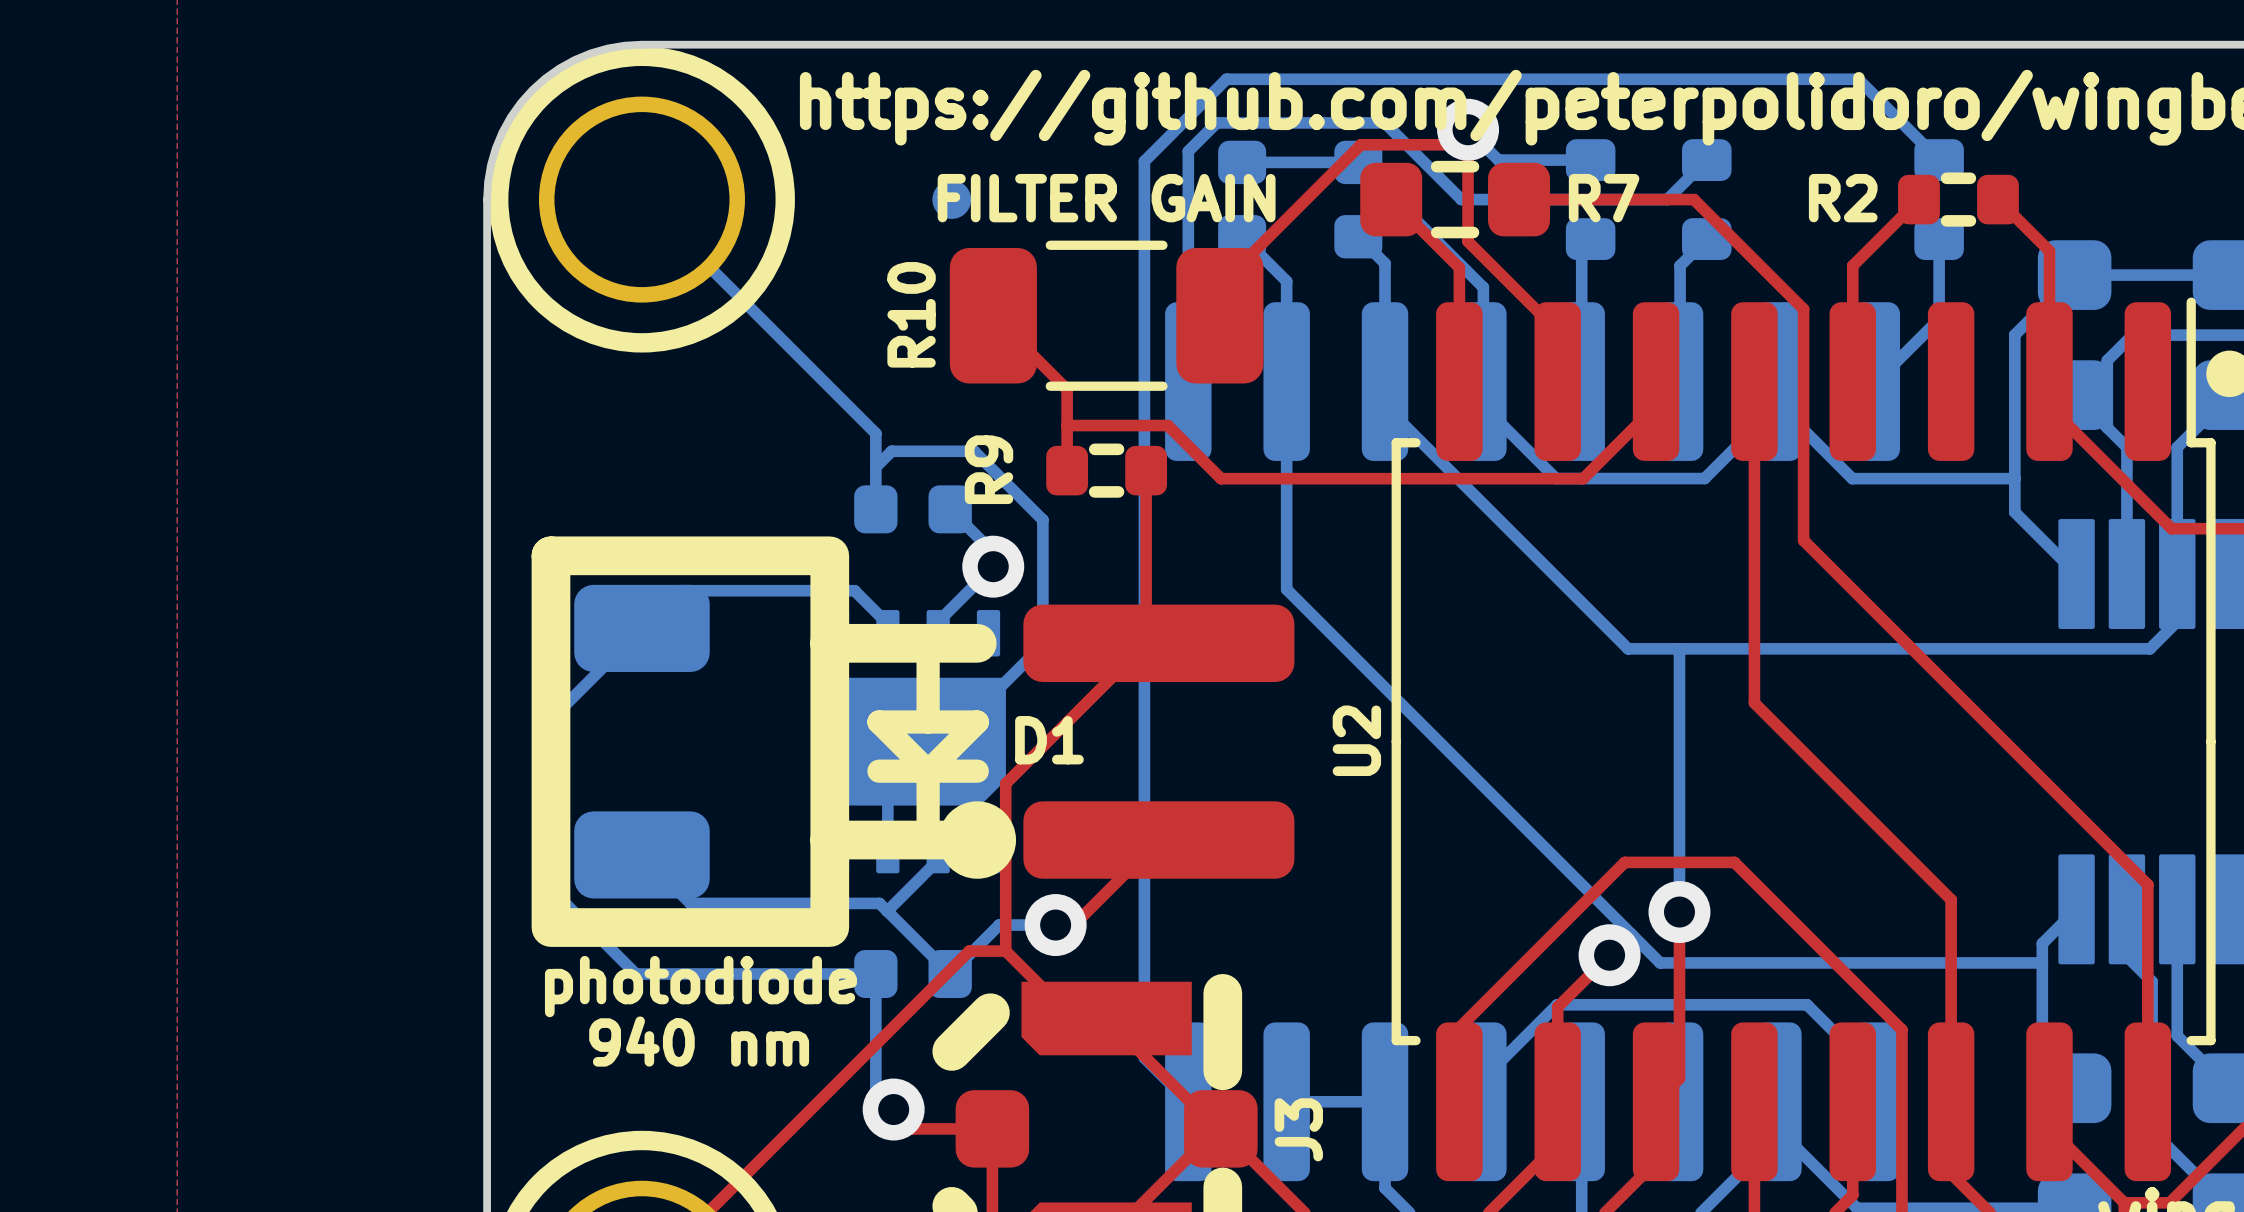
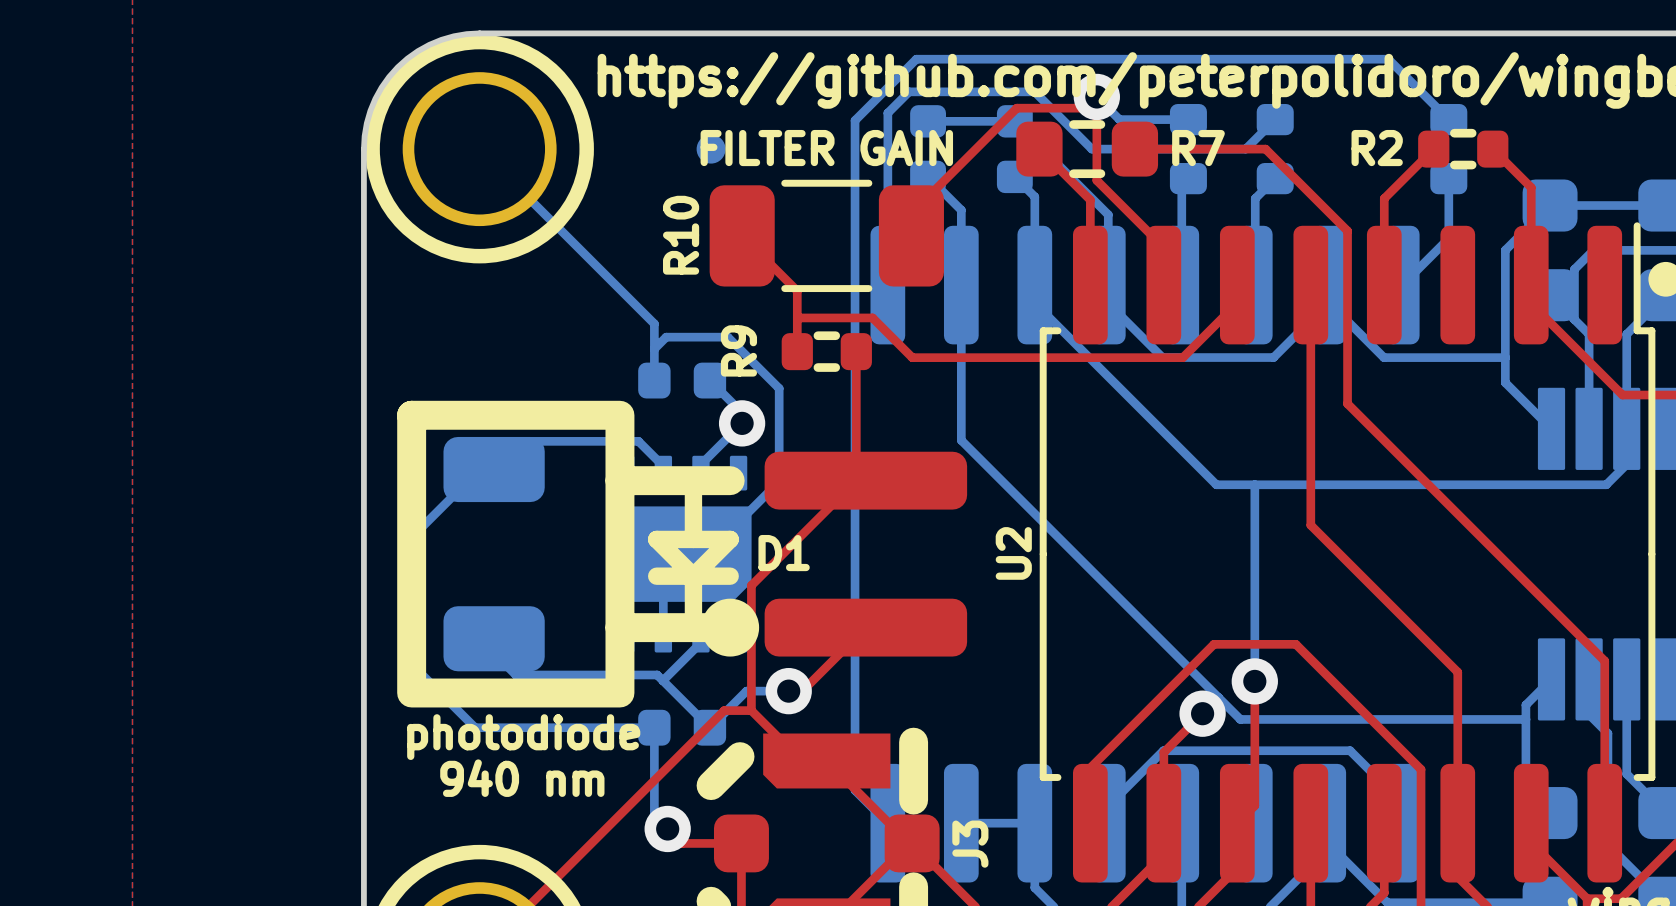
part position: (641, 741) -> (494, 554)

